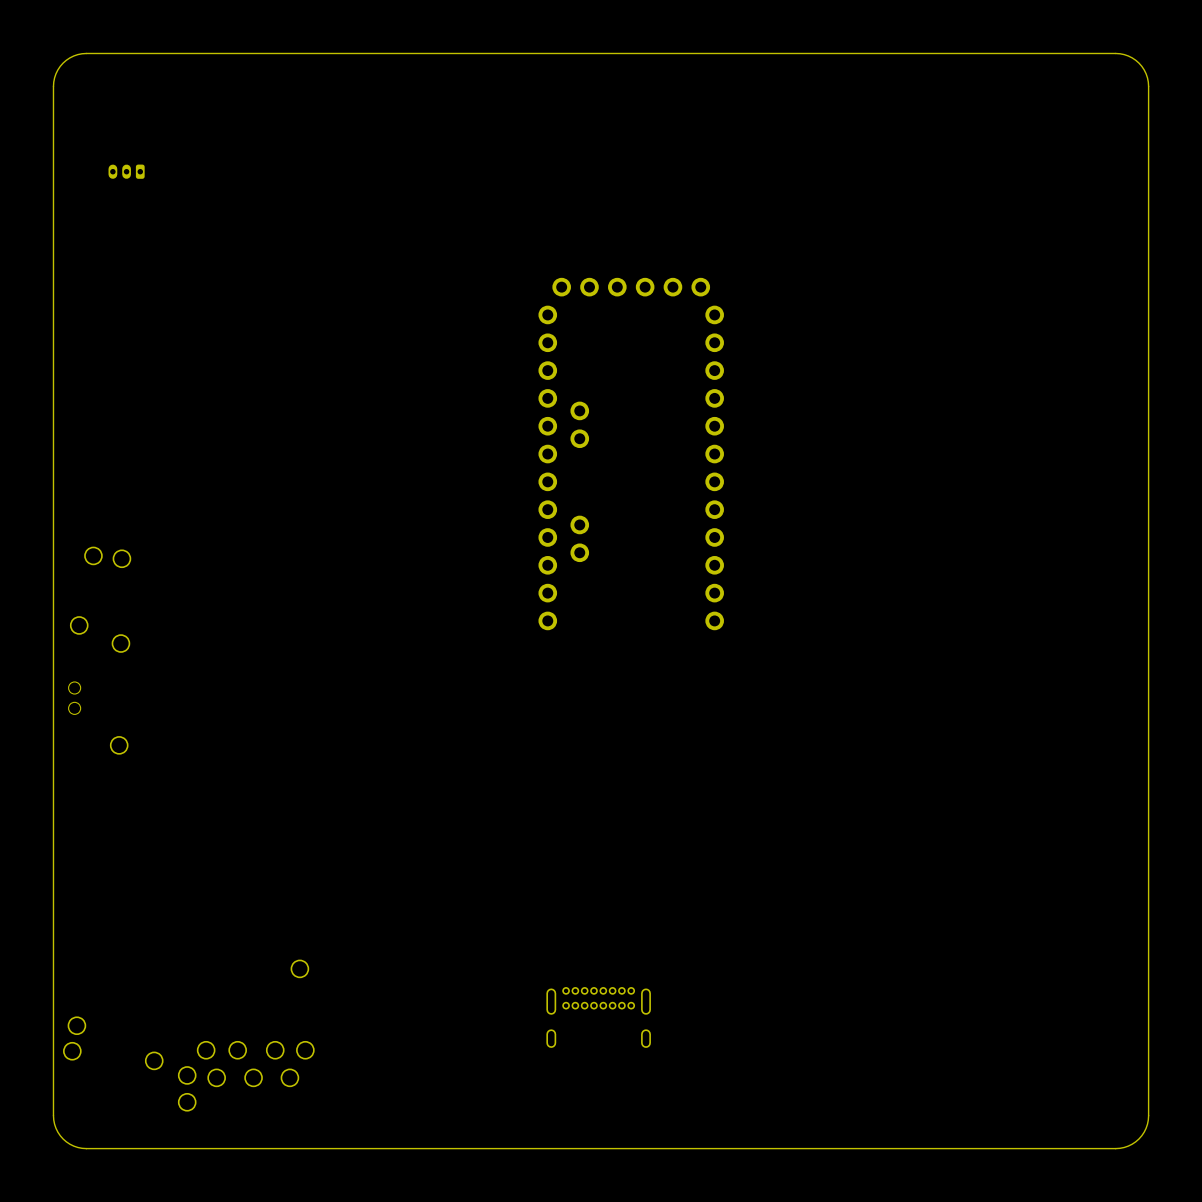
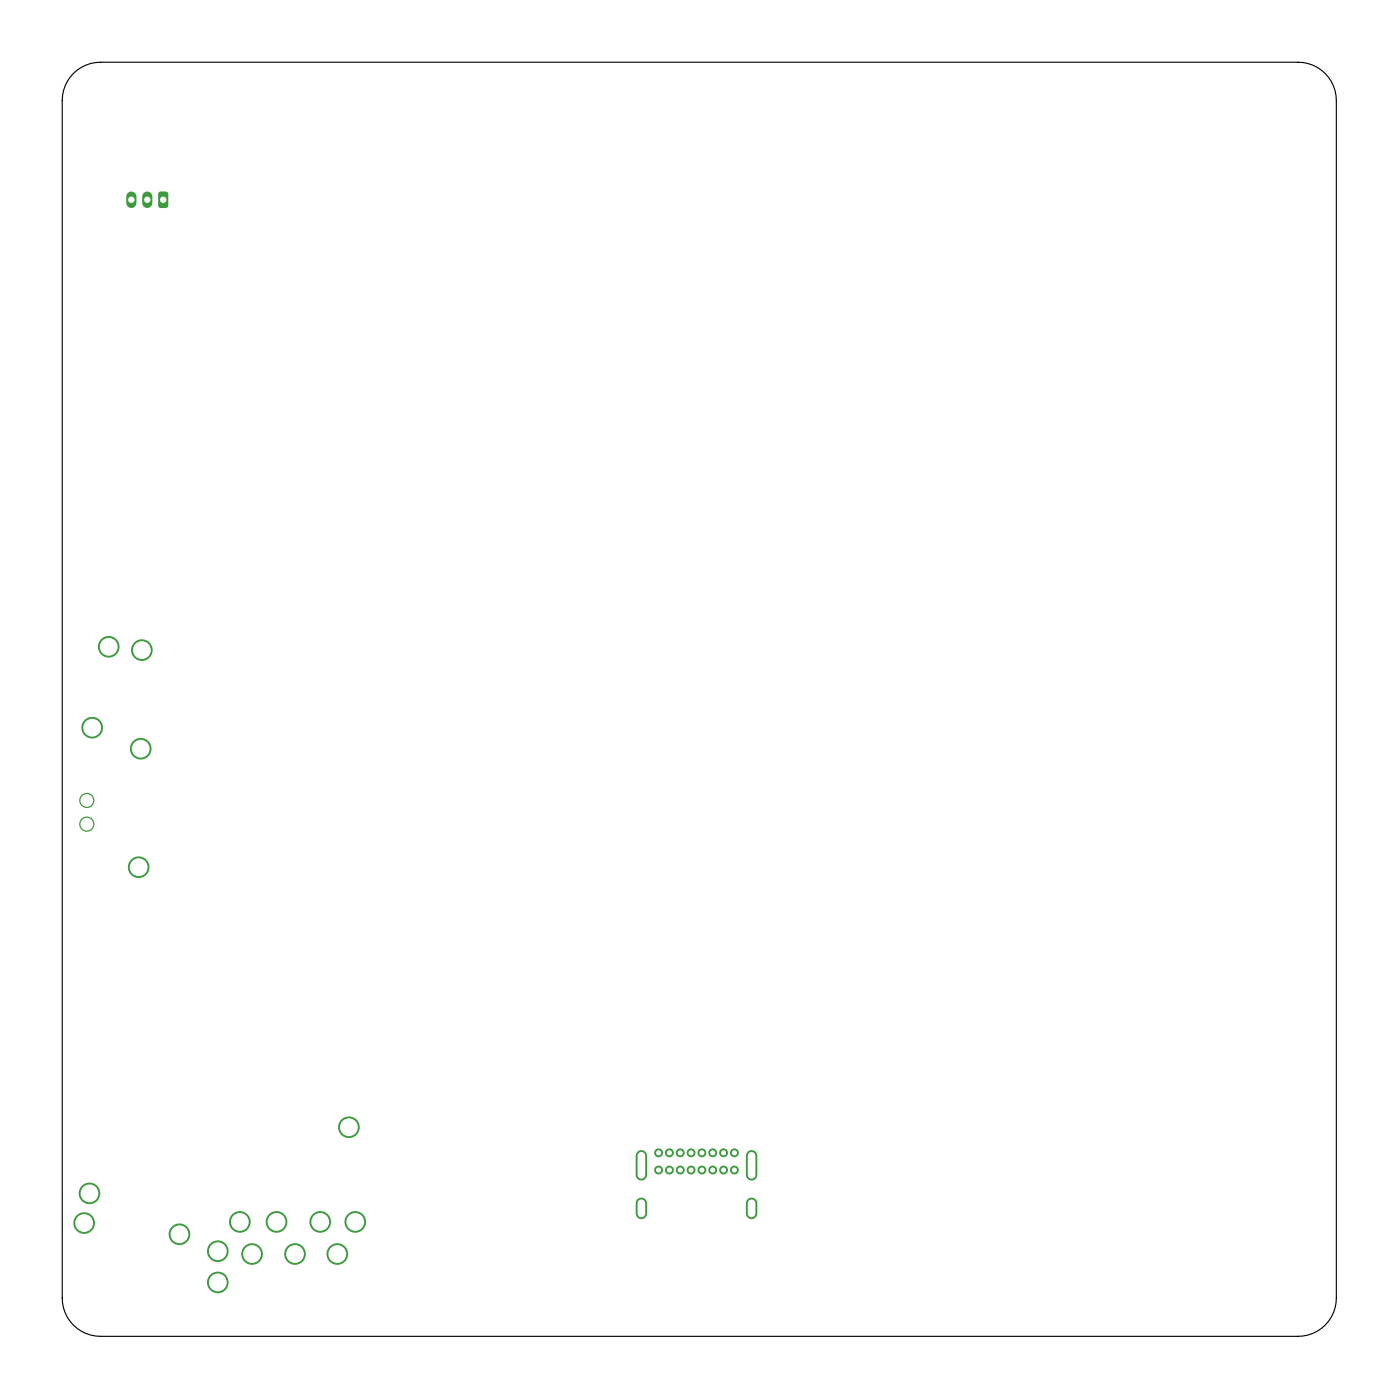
part: (631, 454) -> none

